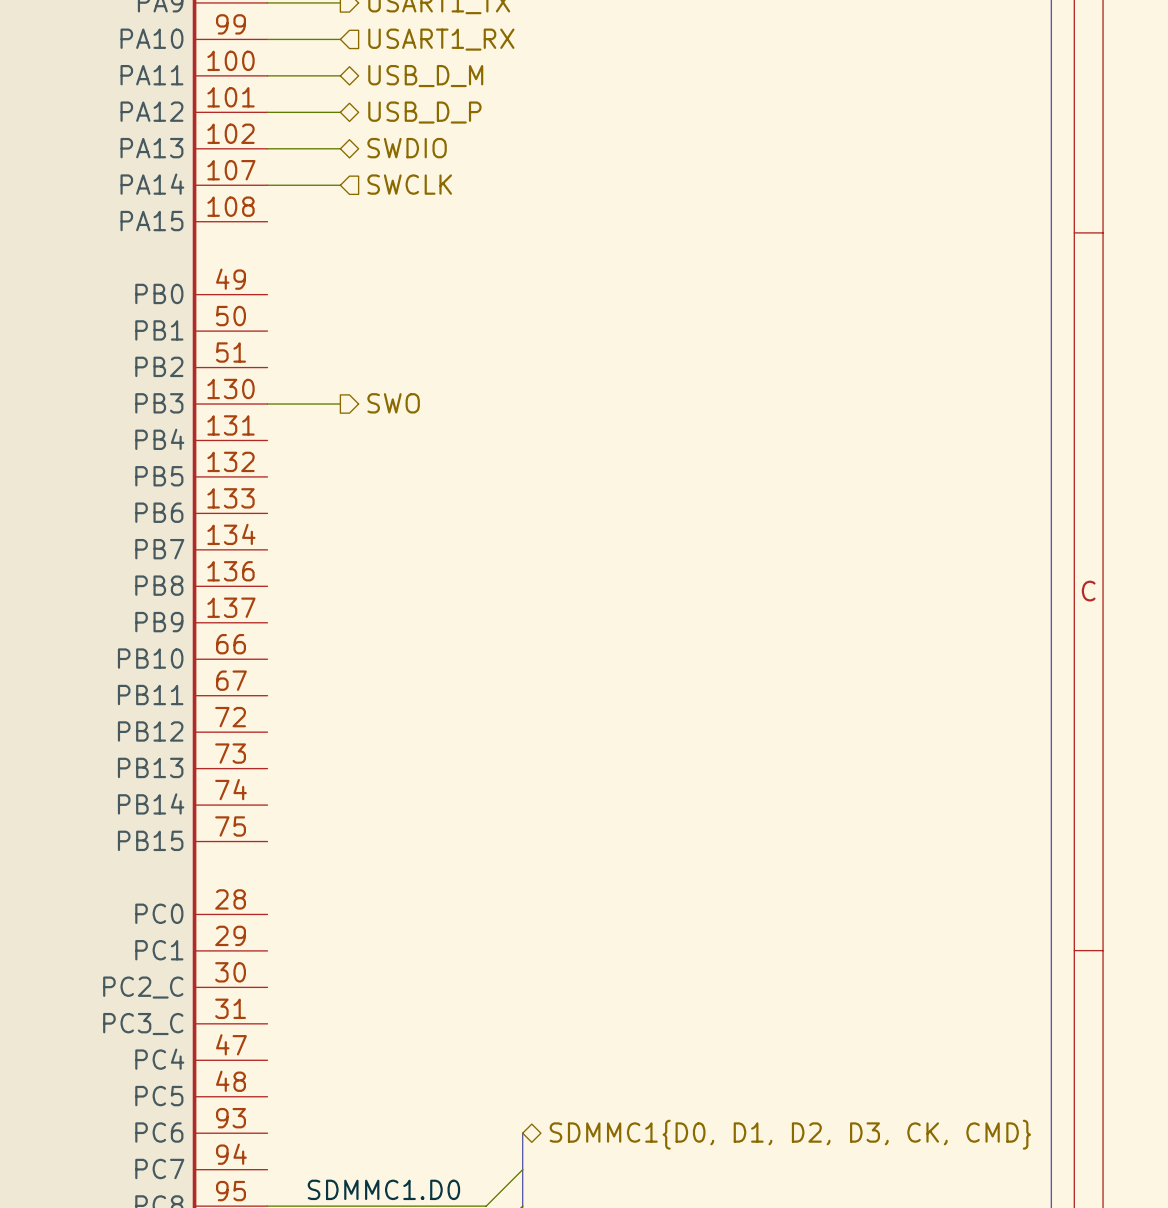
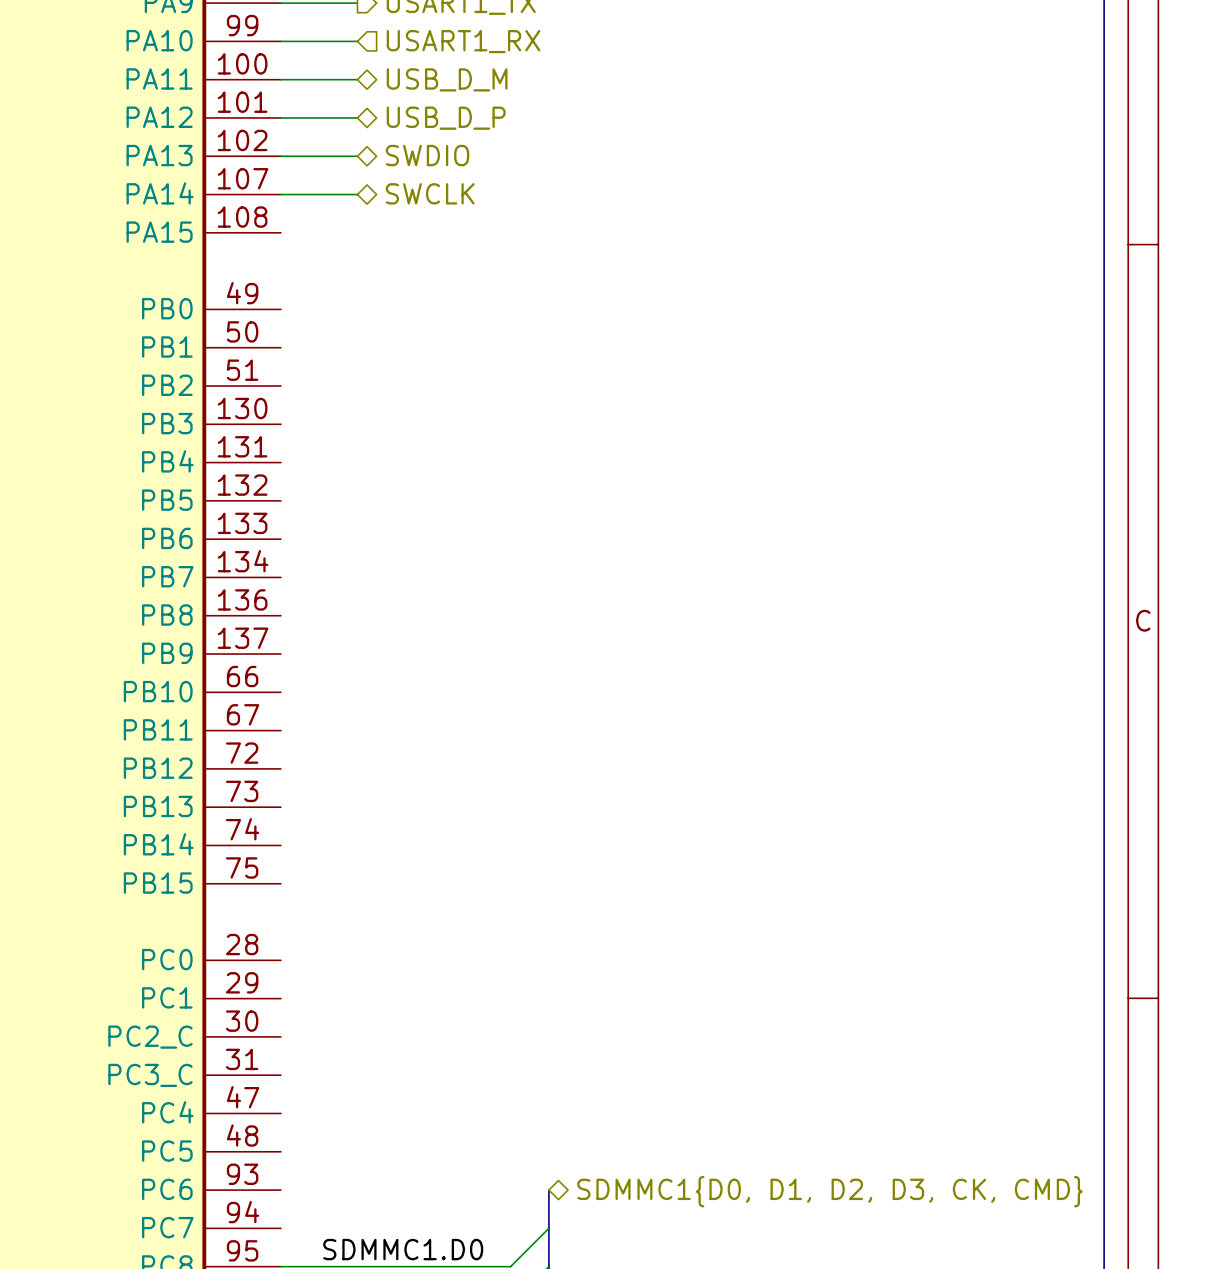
hierarchical label shape: input (409, 184) -> bidirectional (430, 193)
hierarchical label: SWO (393, 403) -> none
wire: (267, 404) (340, 404) -> none

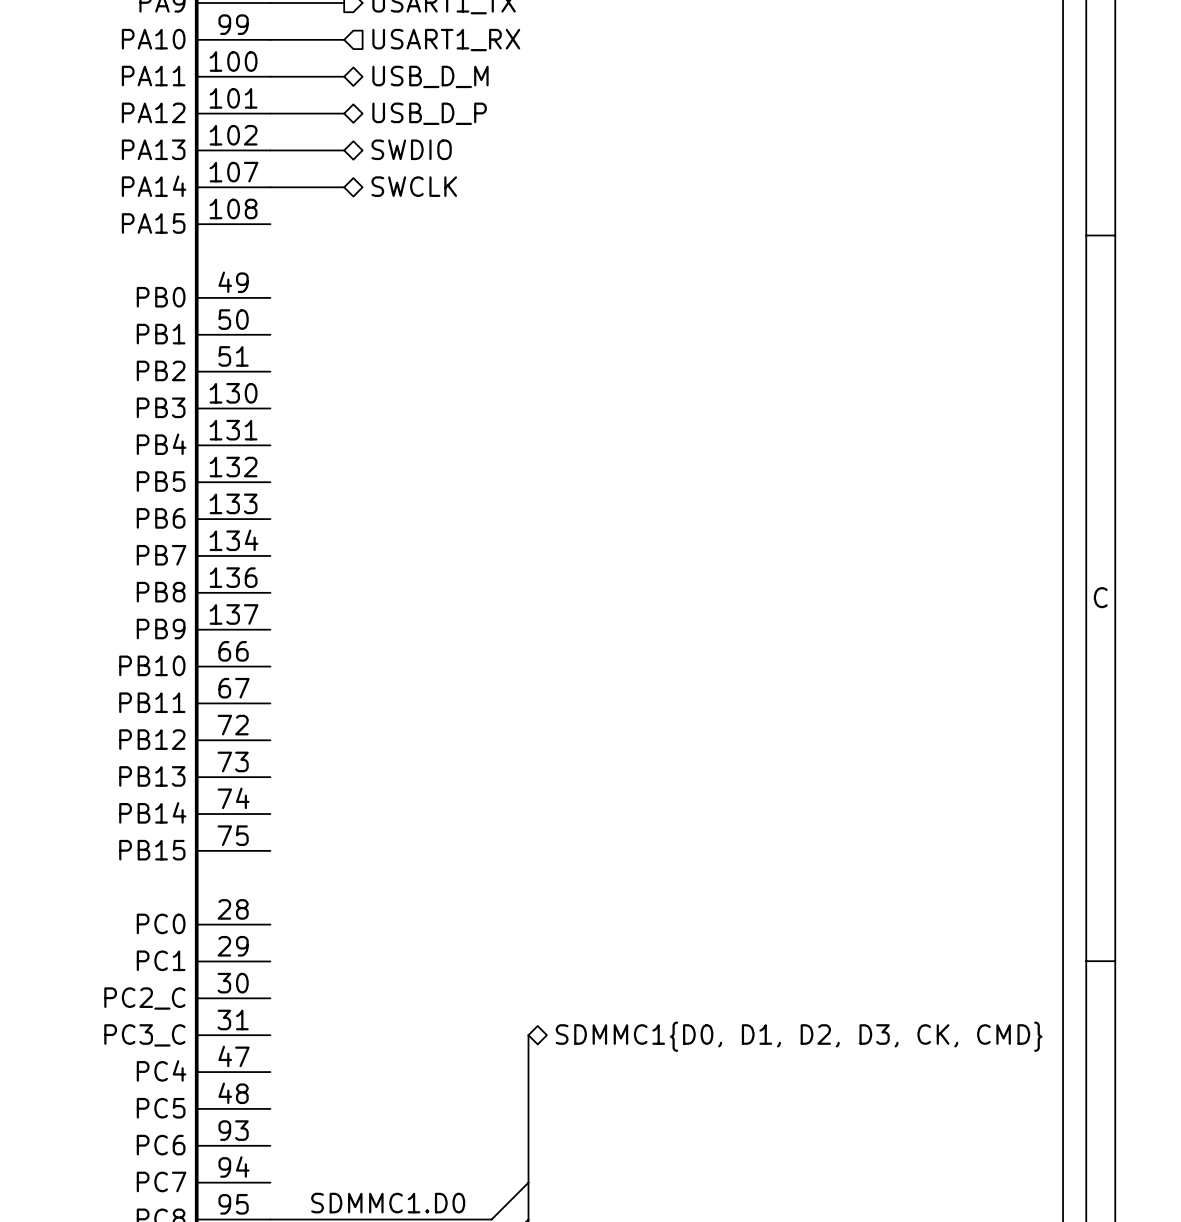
bus: none -> (528, 1035) (528, 1145)
hierarchical label position: SDMMC1{D0, D1, D2, D3, CK, CMD} (829, 1191) -> SDMMC1{D0, D1, D2, D3, CK, CMD} (799, 1036)

